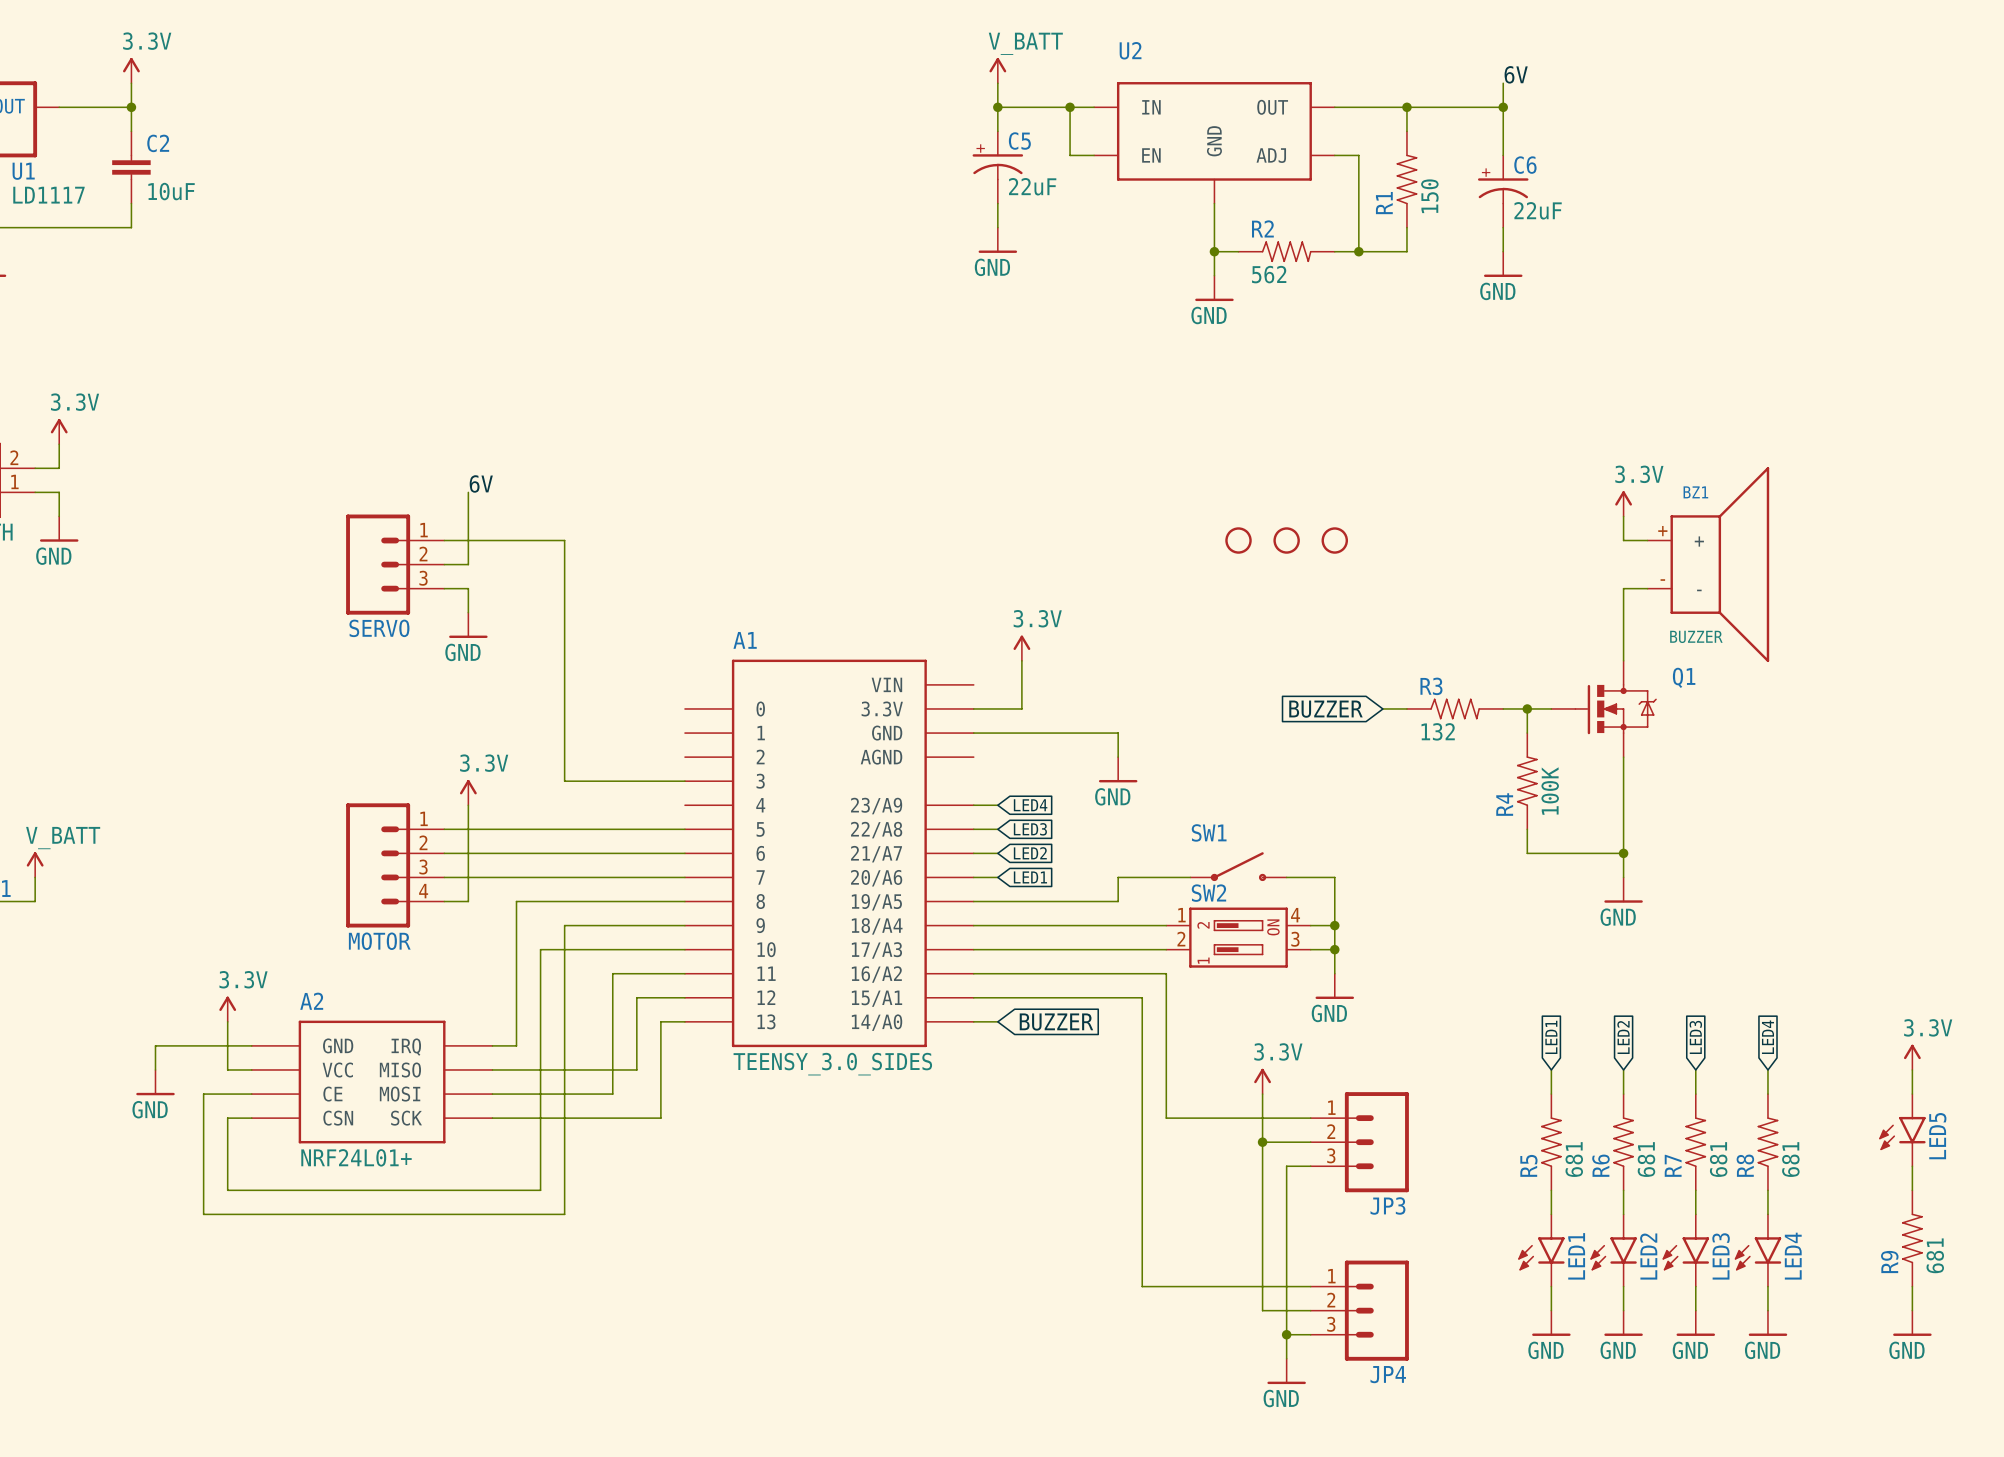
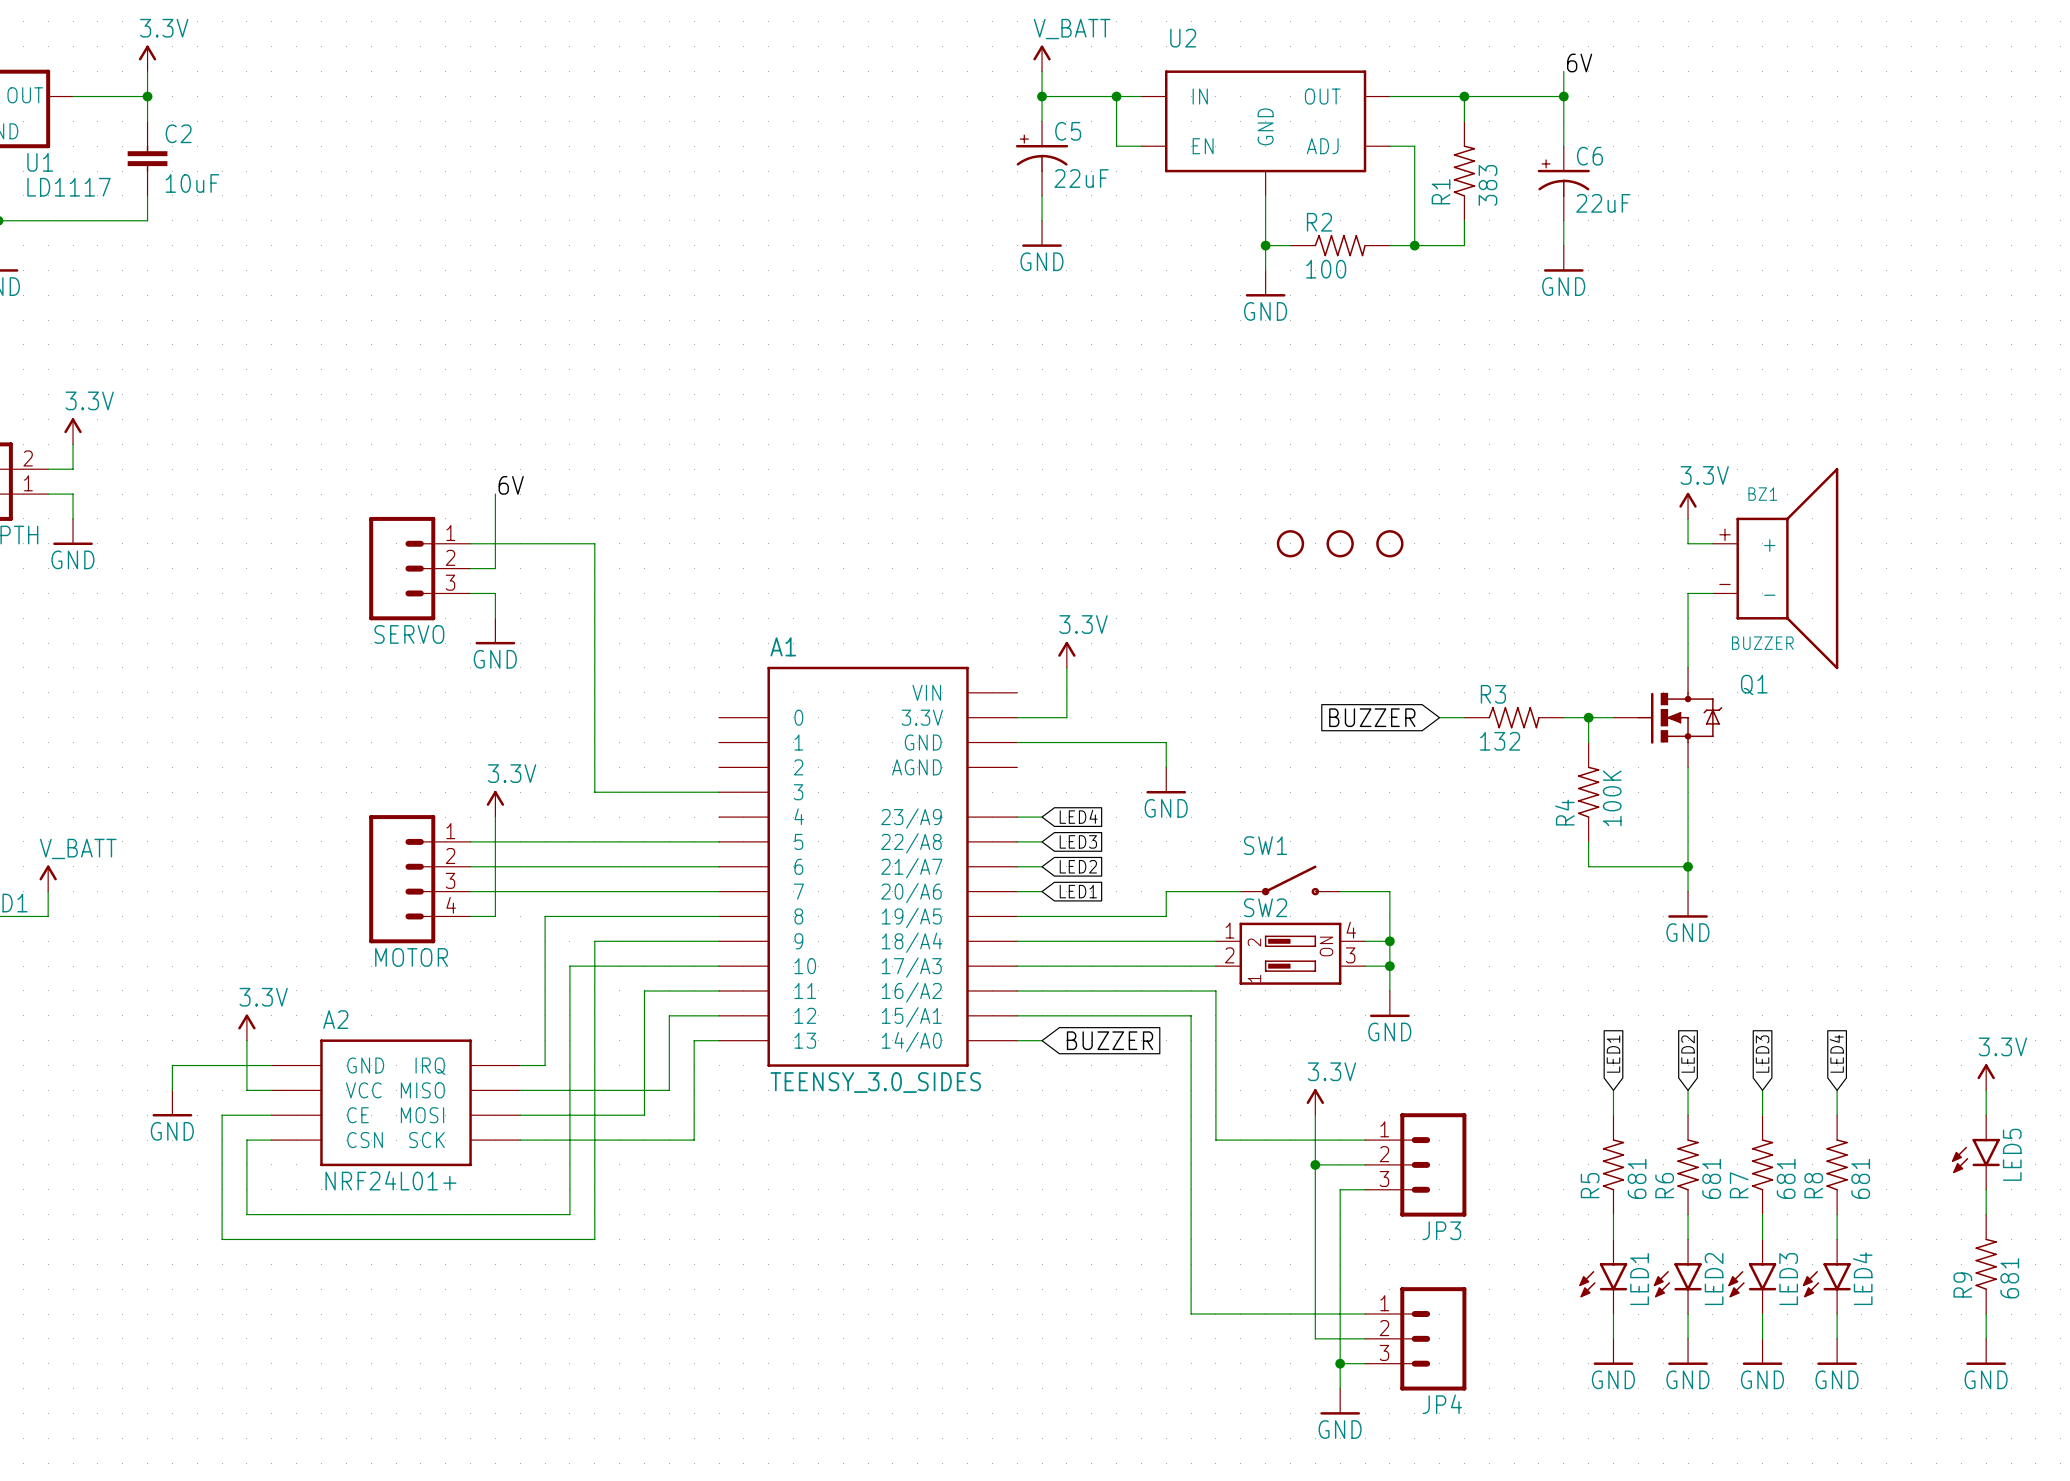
R1 value: 150 (1429, 196) -> 383 (1488, 185)
R2 value: 562 (1269, 274) -> 100 (1326, 269)

